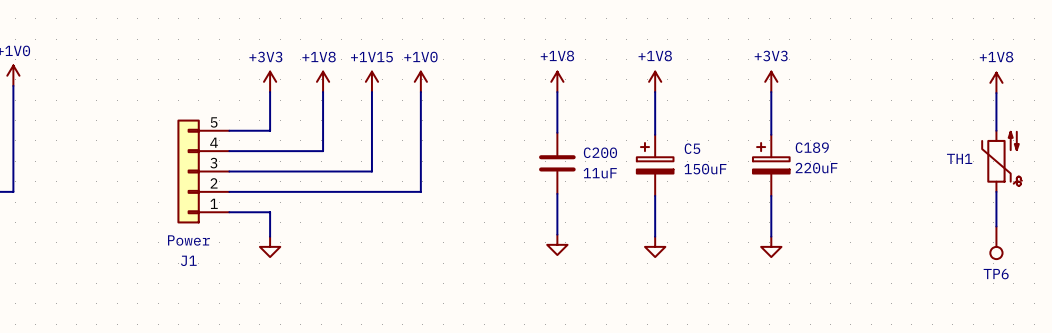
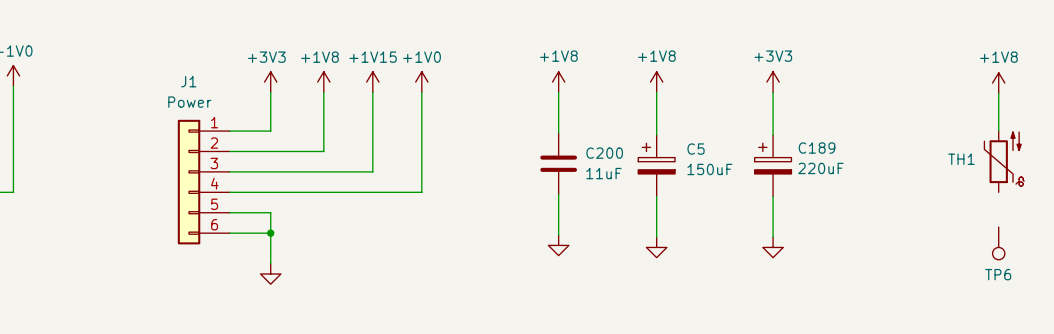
J1 symbol: [177, 119, 230, 224] -> [177, 119, 230, 245]
wire: (996, 191) (996, 226) -> none
wire: none -> (229, 233) (270, 233)
junction: none -> (270, 233)
wire: none -> (270, 237) (270, 263)
J1 value position: Power (188, 240) -> Power (189, 102)
power symbol position: (270, 246) -> (270, 274)
J1 name position: J1 (188, 260) -> J1 (188, 81)

